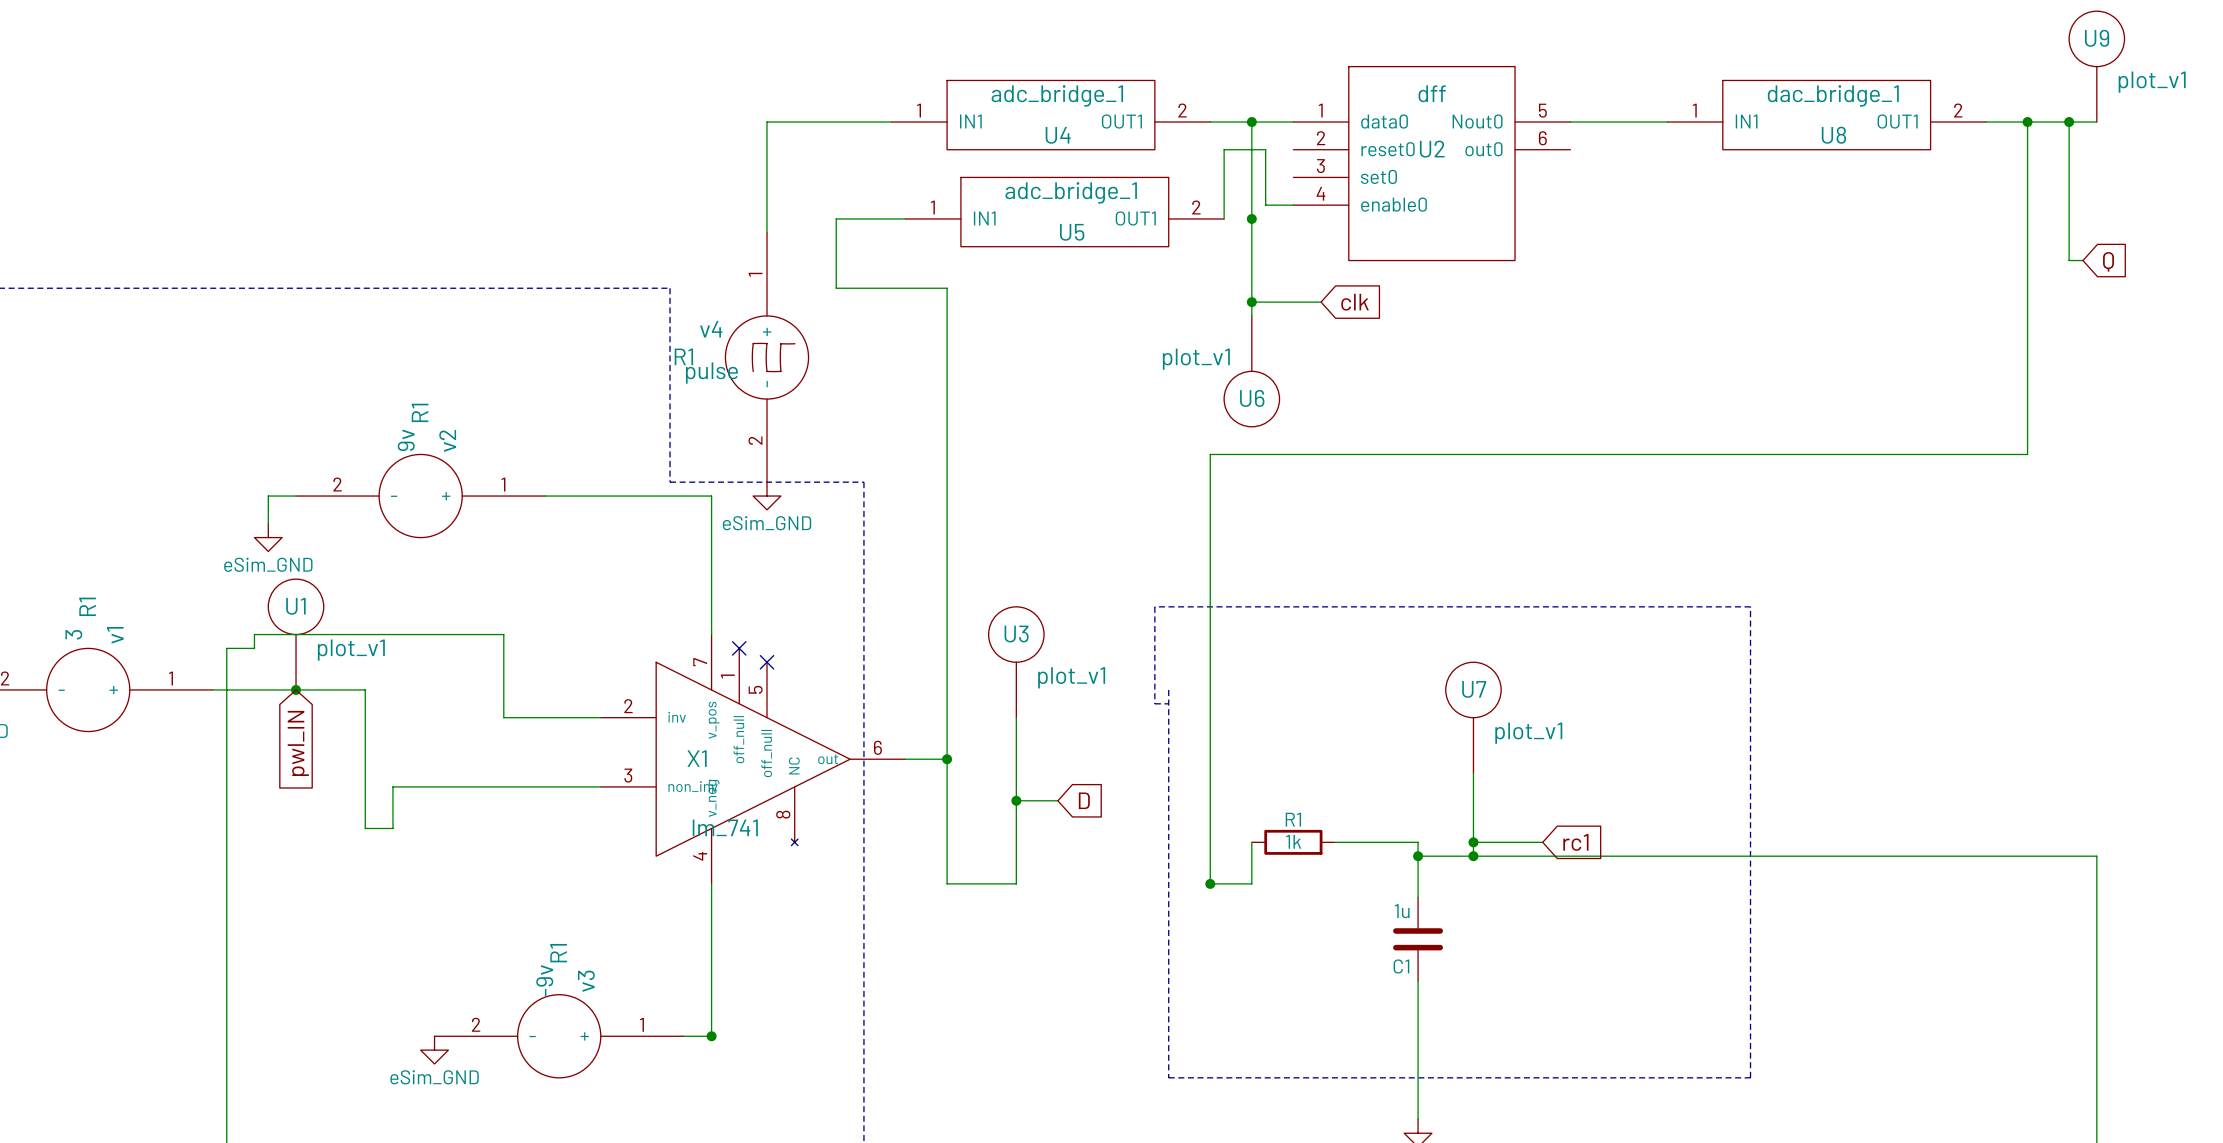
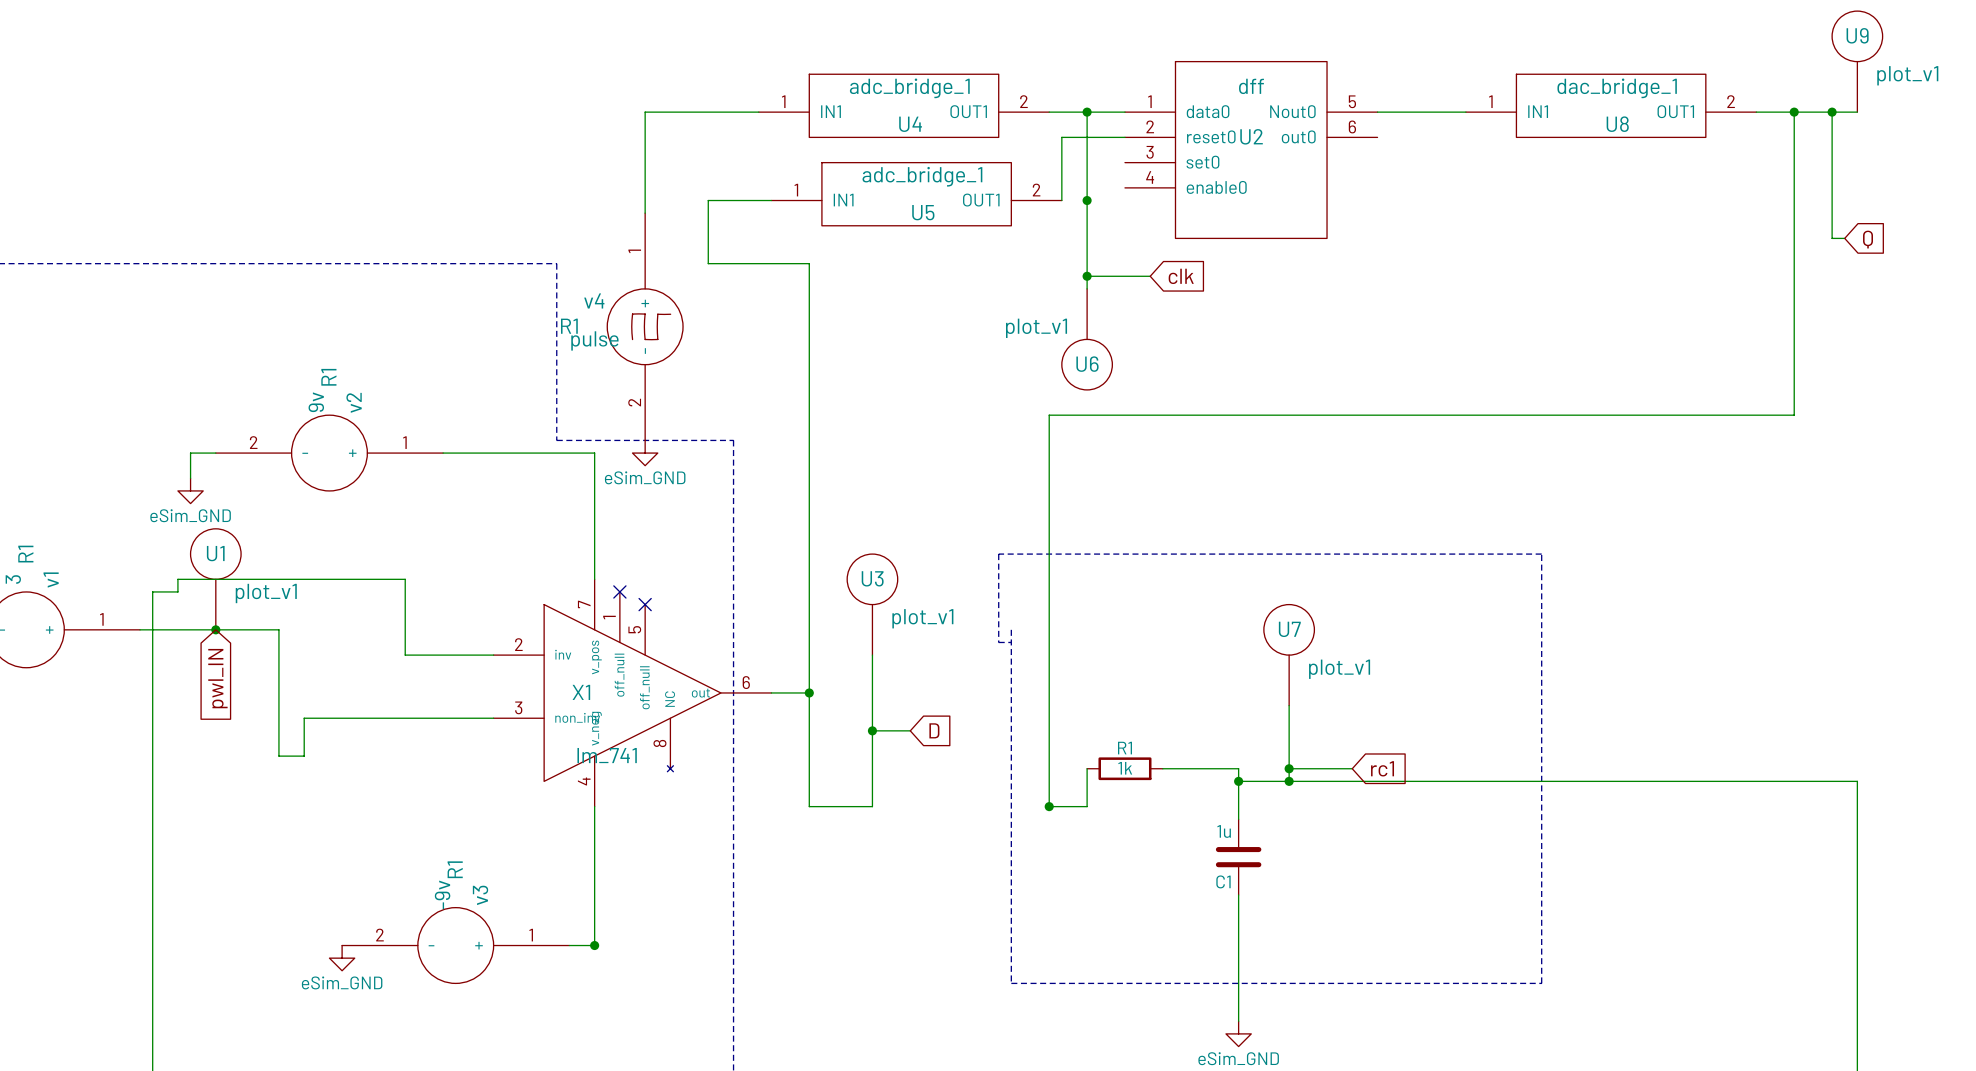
wire: (1265, 149) (1265, 205) (1293, 205) -> (1099, 137) (1124, 137)

